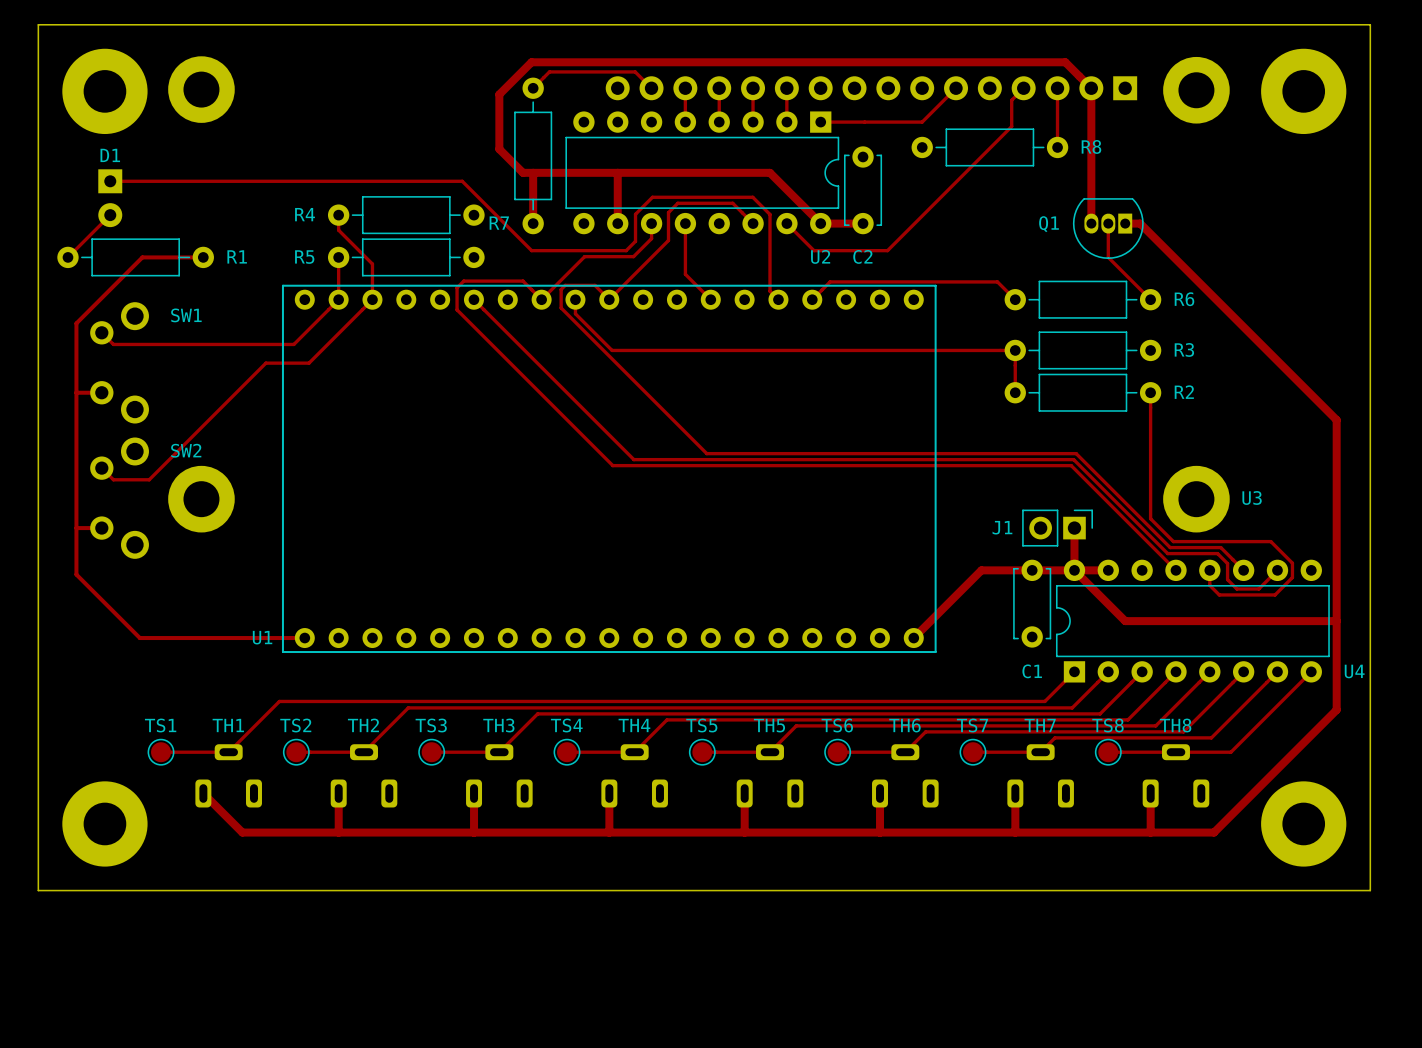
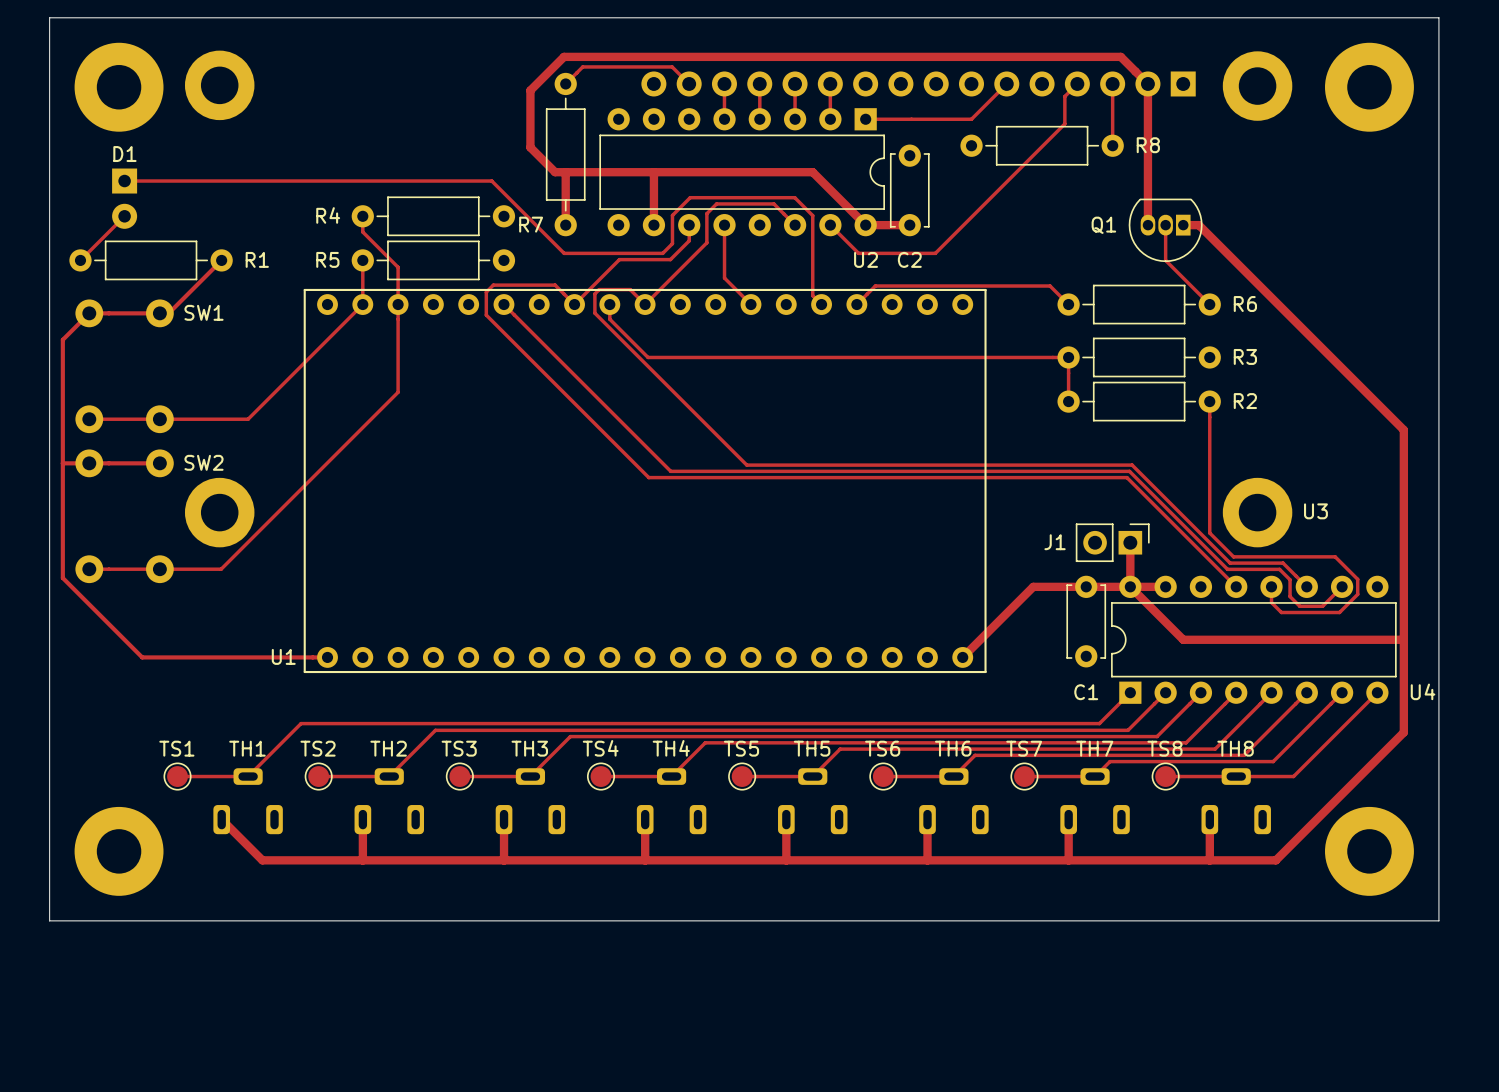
track: (203, 257) (142, 257) (76, 323) (76, 574) (139, 638) -> (221, 260) (168, 313) (89, 313) (62, 339) (62, 578) (142, 657) (155, 657)
track: (372, 299) (309, 363) (265, 363) (149, 479) (113, 479) (101, 468) -> (398, 304) (398, 392) (221, 569) (89, 569)
SW1 footprint: [90, 302, 149, 424] -> [75, 299, 174, 434]
track: (101, 332) (113, 344) (293, 344) -> (89, 419) (248, 419) (316, 351)
track: (76, 392) (101, 392) -> none
SW2 footprint: [90, 437, 149, 559] -> [75, 449, 174, 584]
track: none -> (62, 463) (159, 463)
track: (76, 528) (101, 528) -> none

